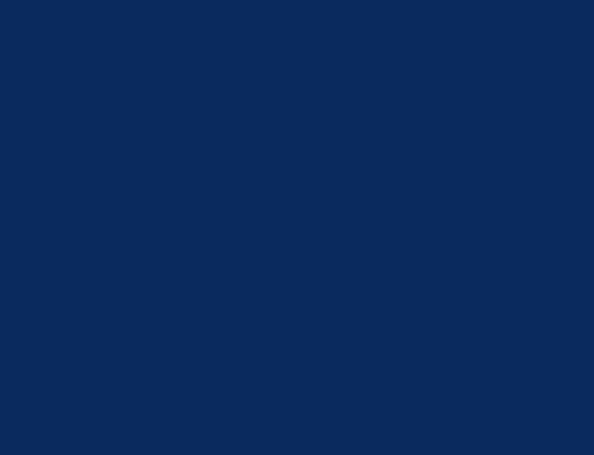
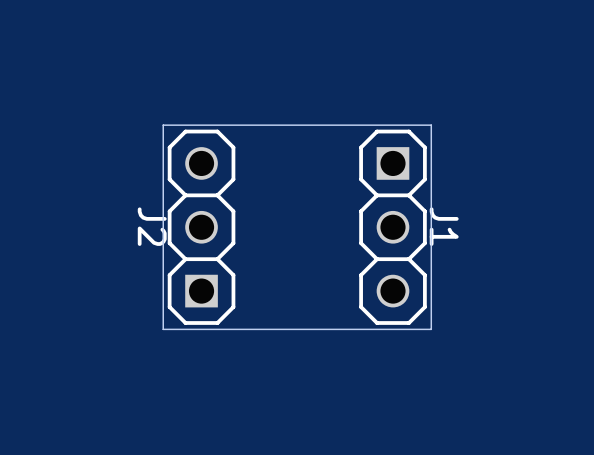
board edge: none -> (431, 125) (431, 329) (163, 329) (163, 125) (431, 125)
J2: none -> (201, 227)
J1: none -> (392, 227)

